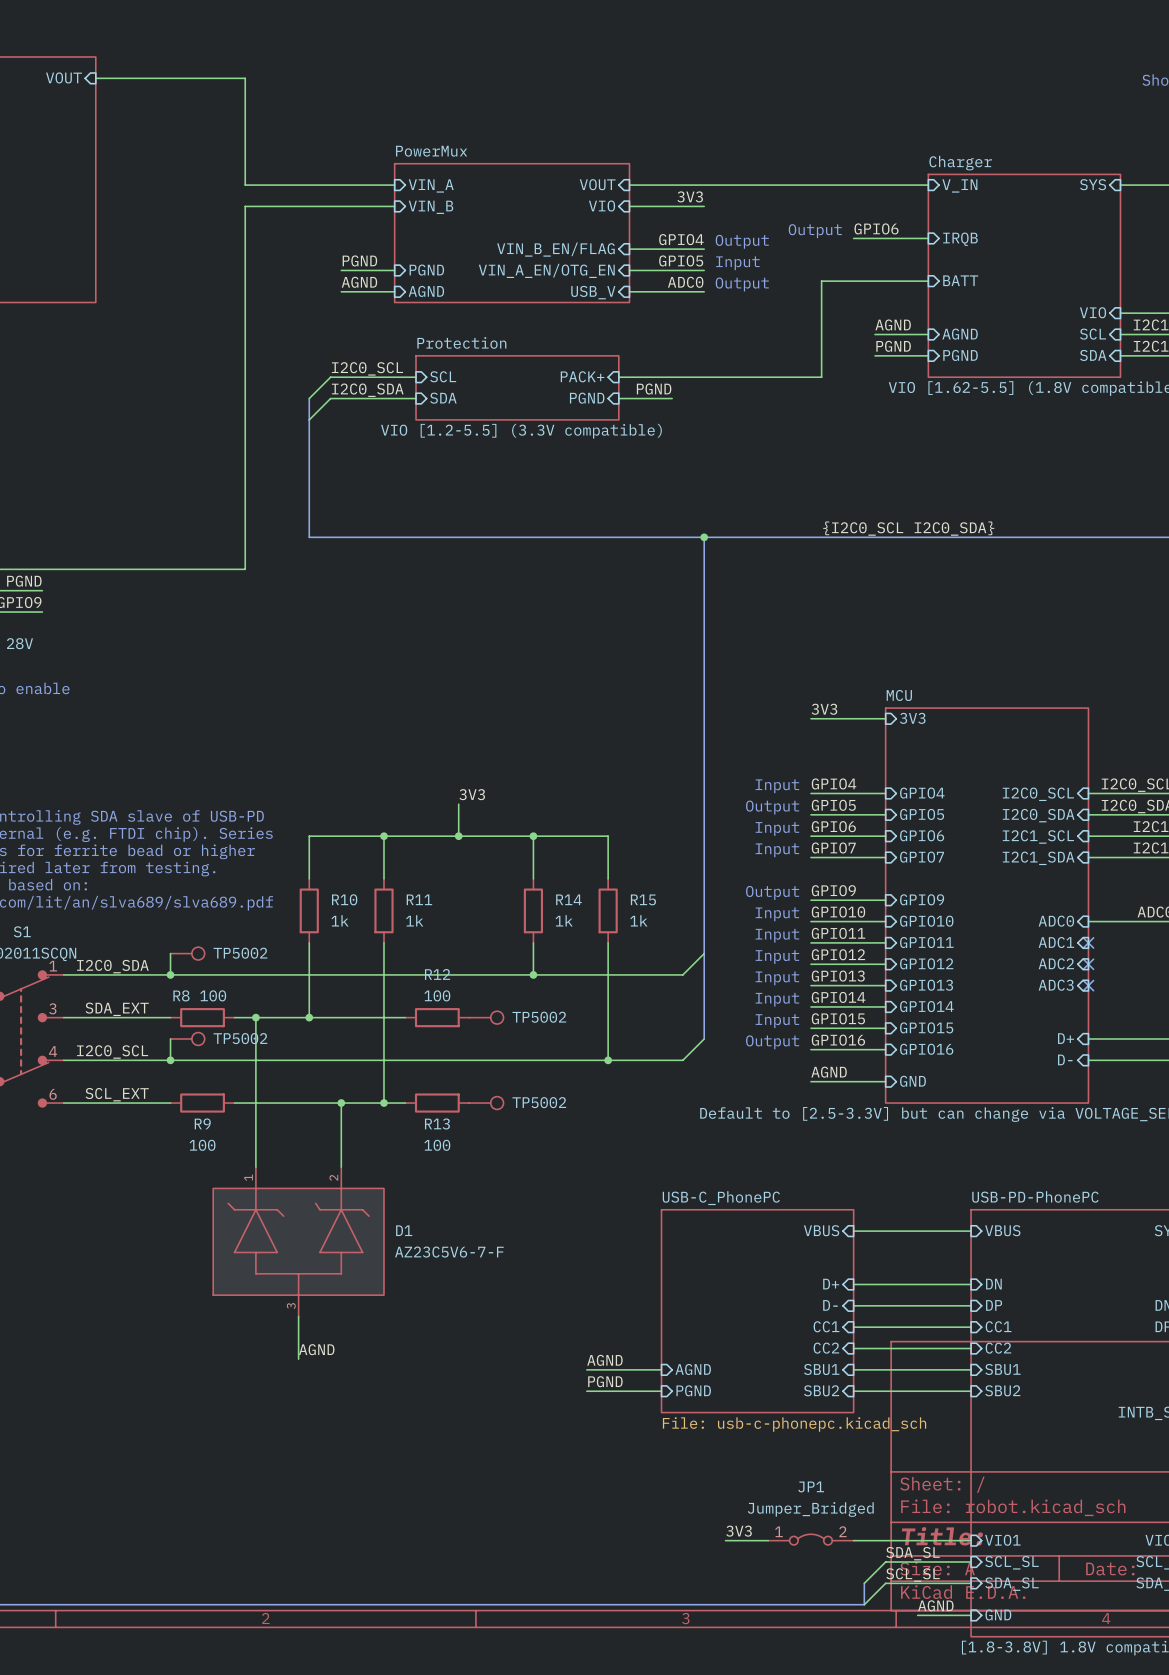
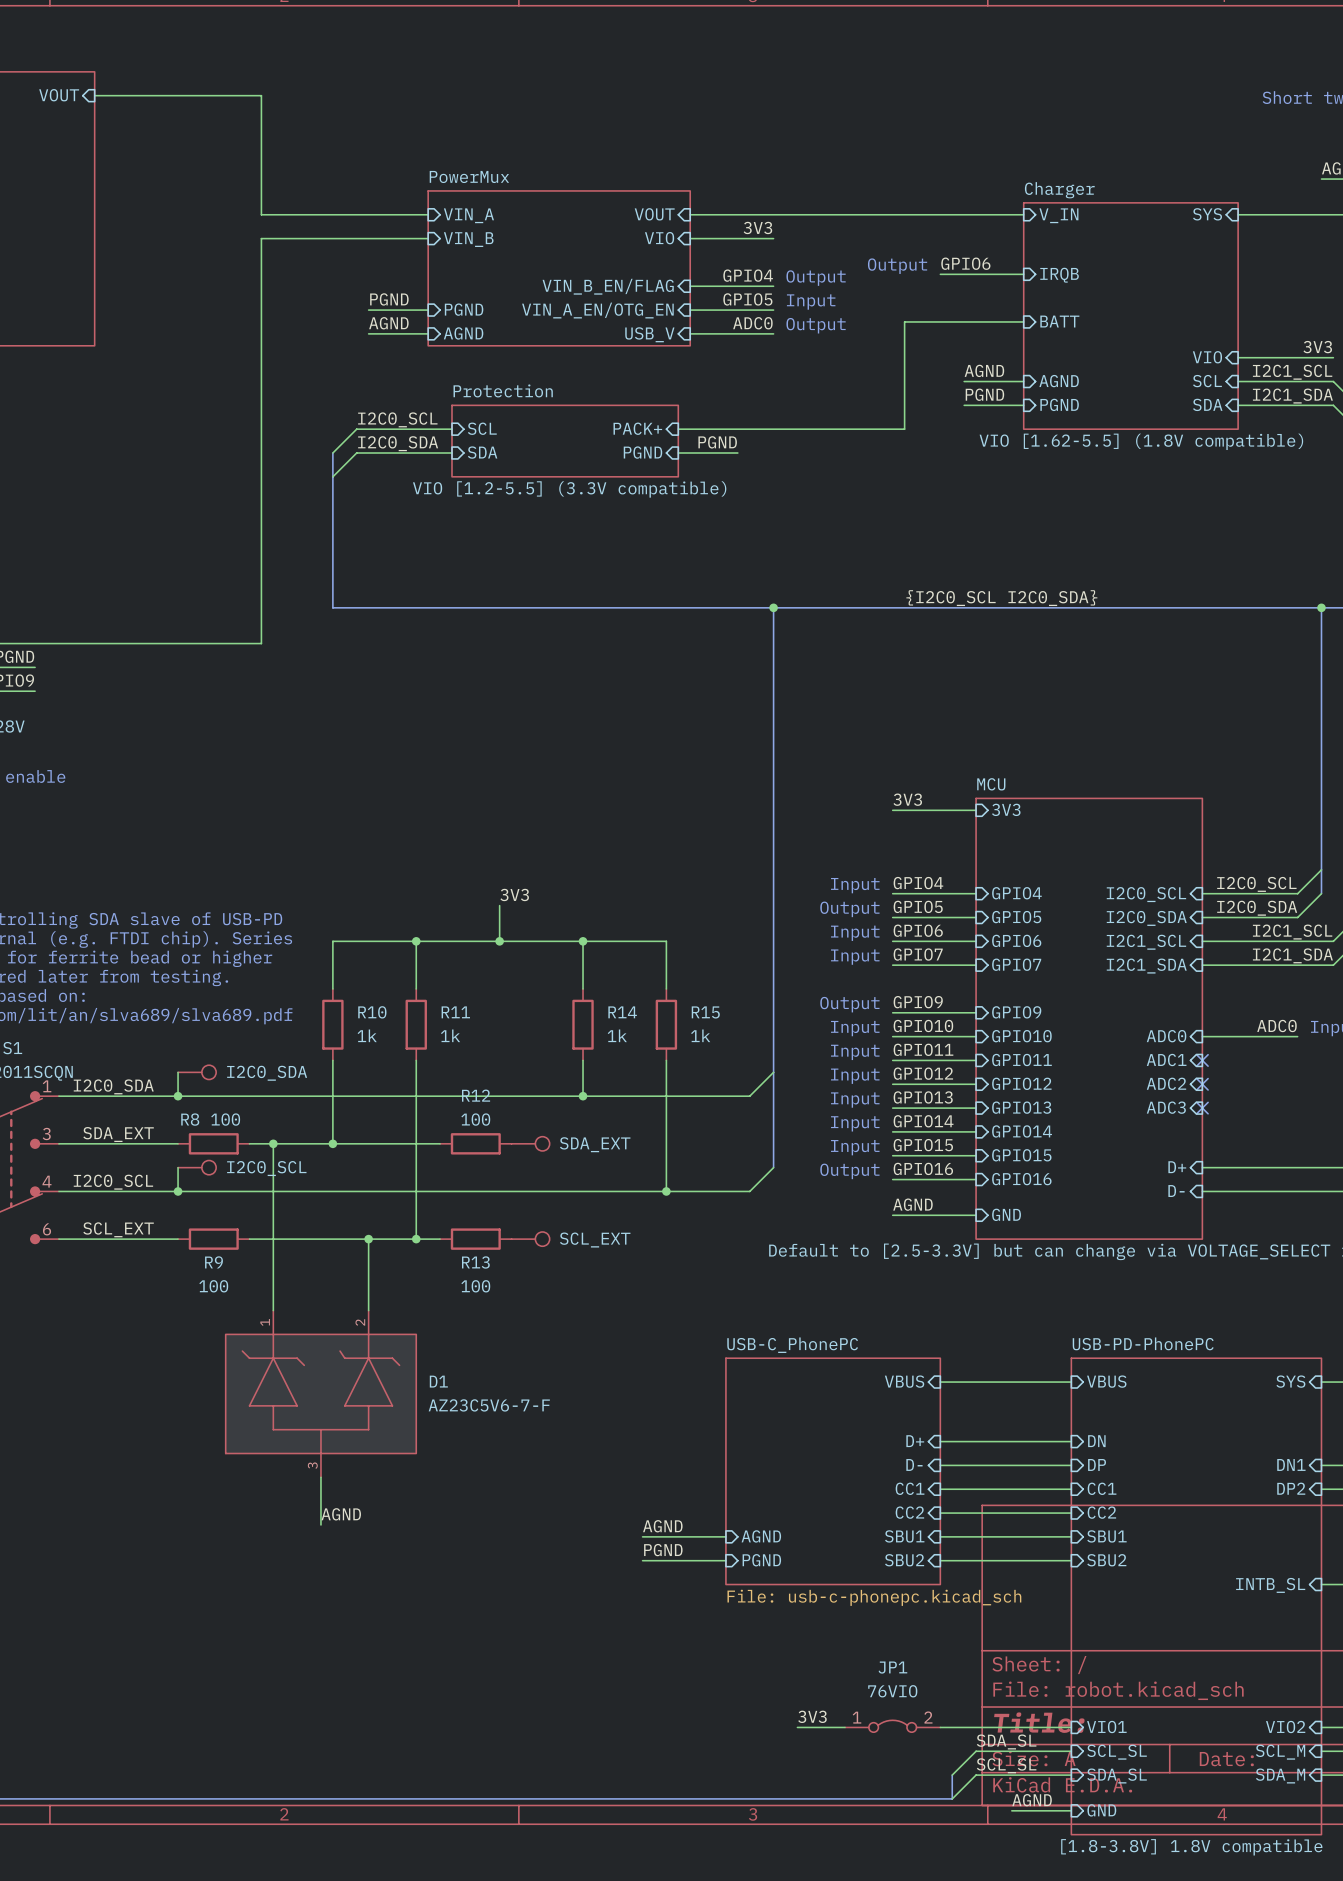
part value: TP5002 (240, 953) -> I2C0_SDA (267, 1073)
part value: TP5002 (539, 1017) -> SDA_EXT (595, 1144)
part value: TP5002 (240, 1038) -> I2C0_SCL (266, 1168)
part value: TP5002 (539, 1102) -> SCL_EXT (595, 1240)
JP1 value: Jumper_Bridged (810, 1509) -> 76VIO (892, 1691)

